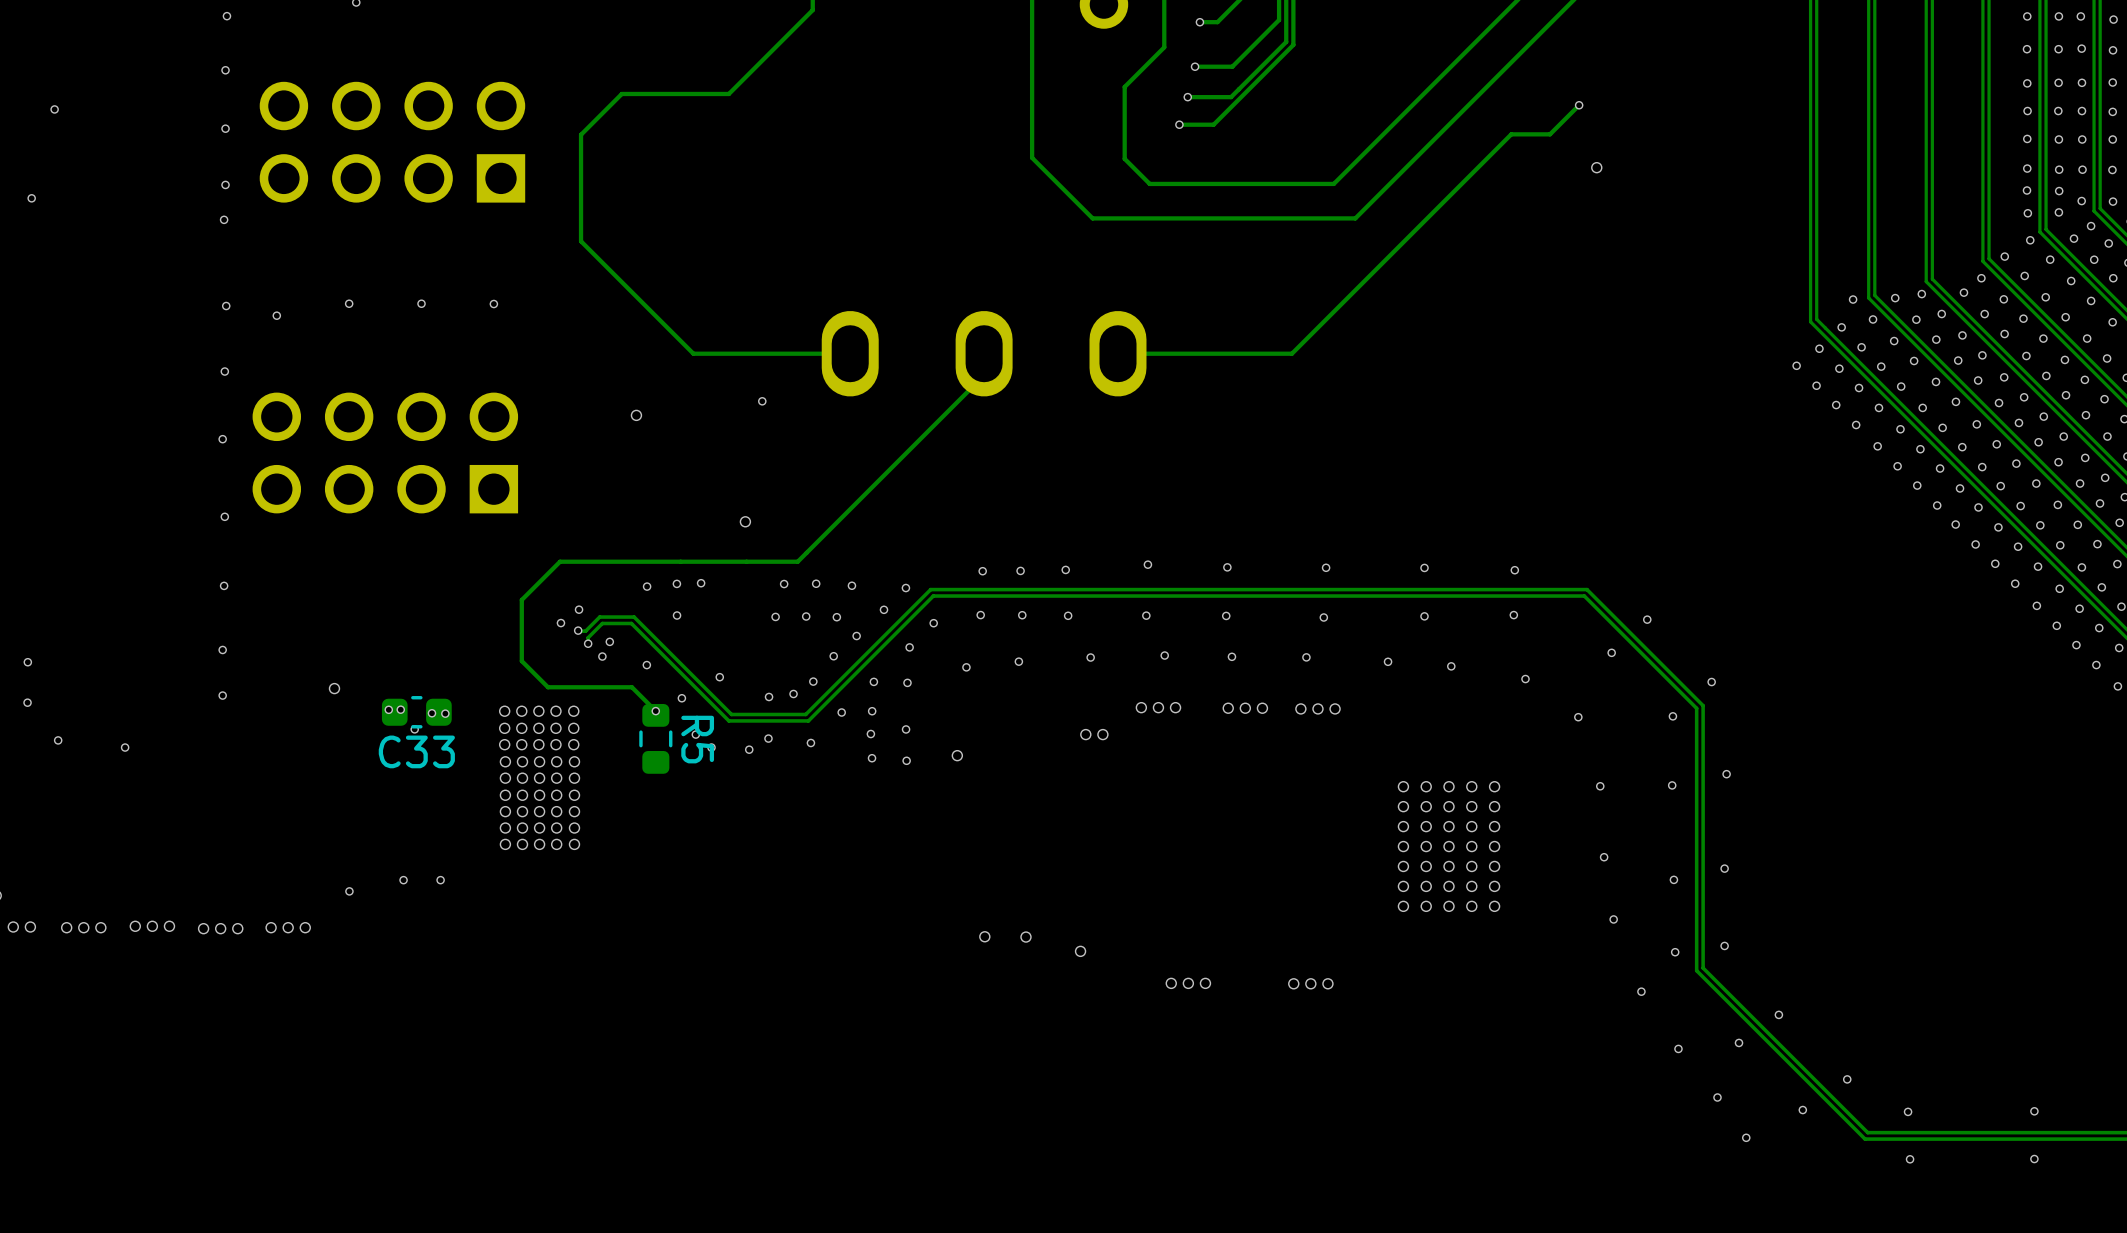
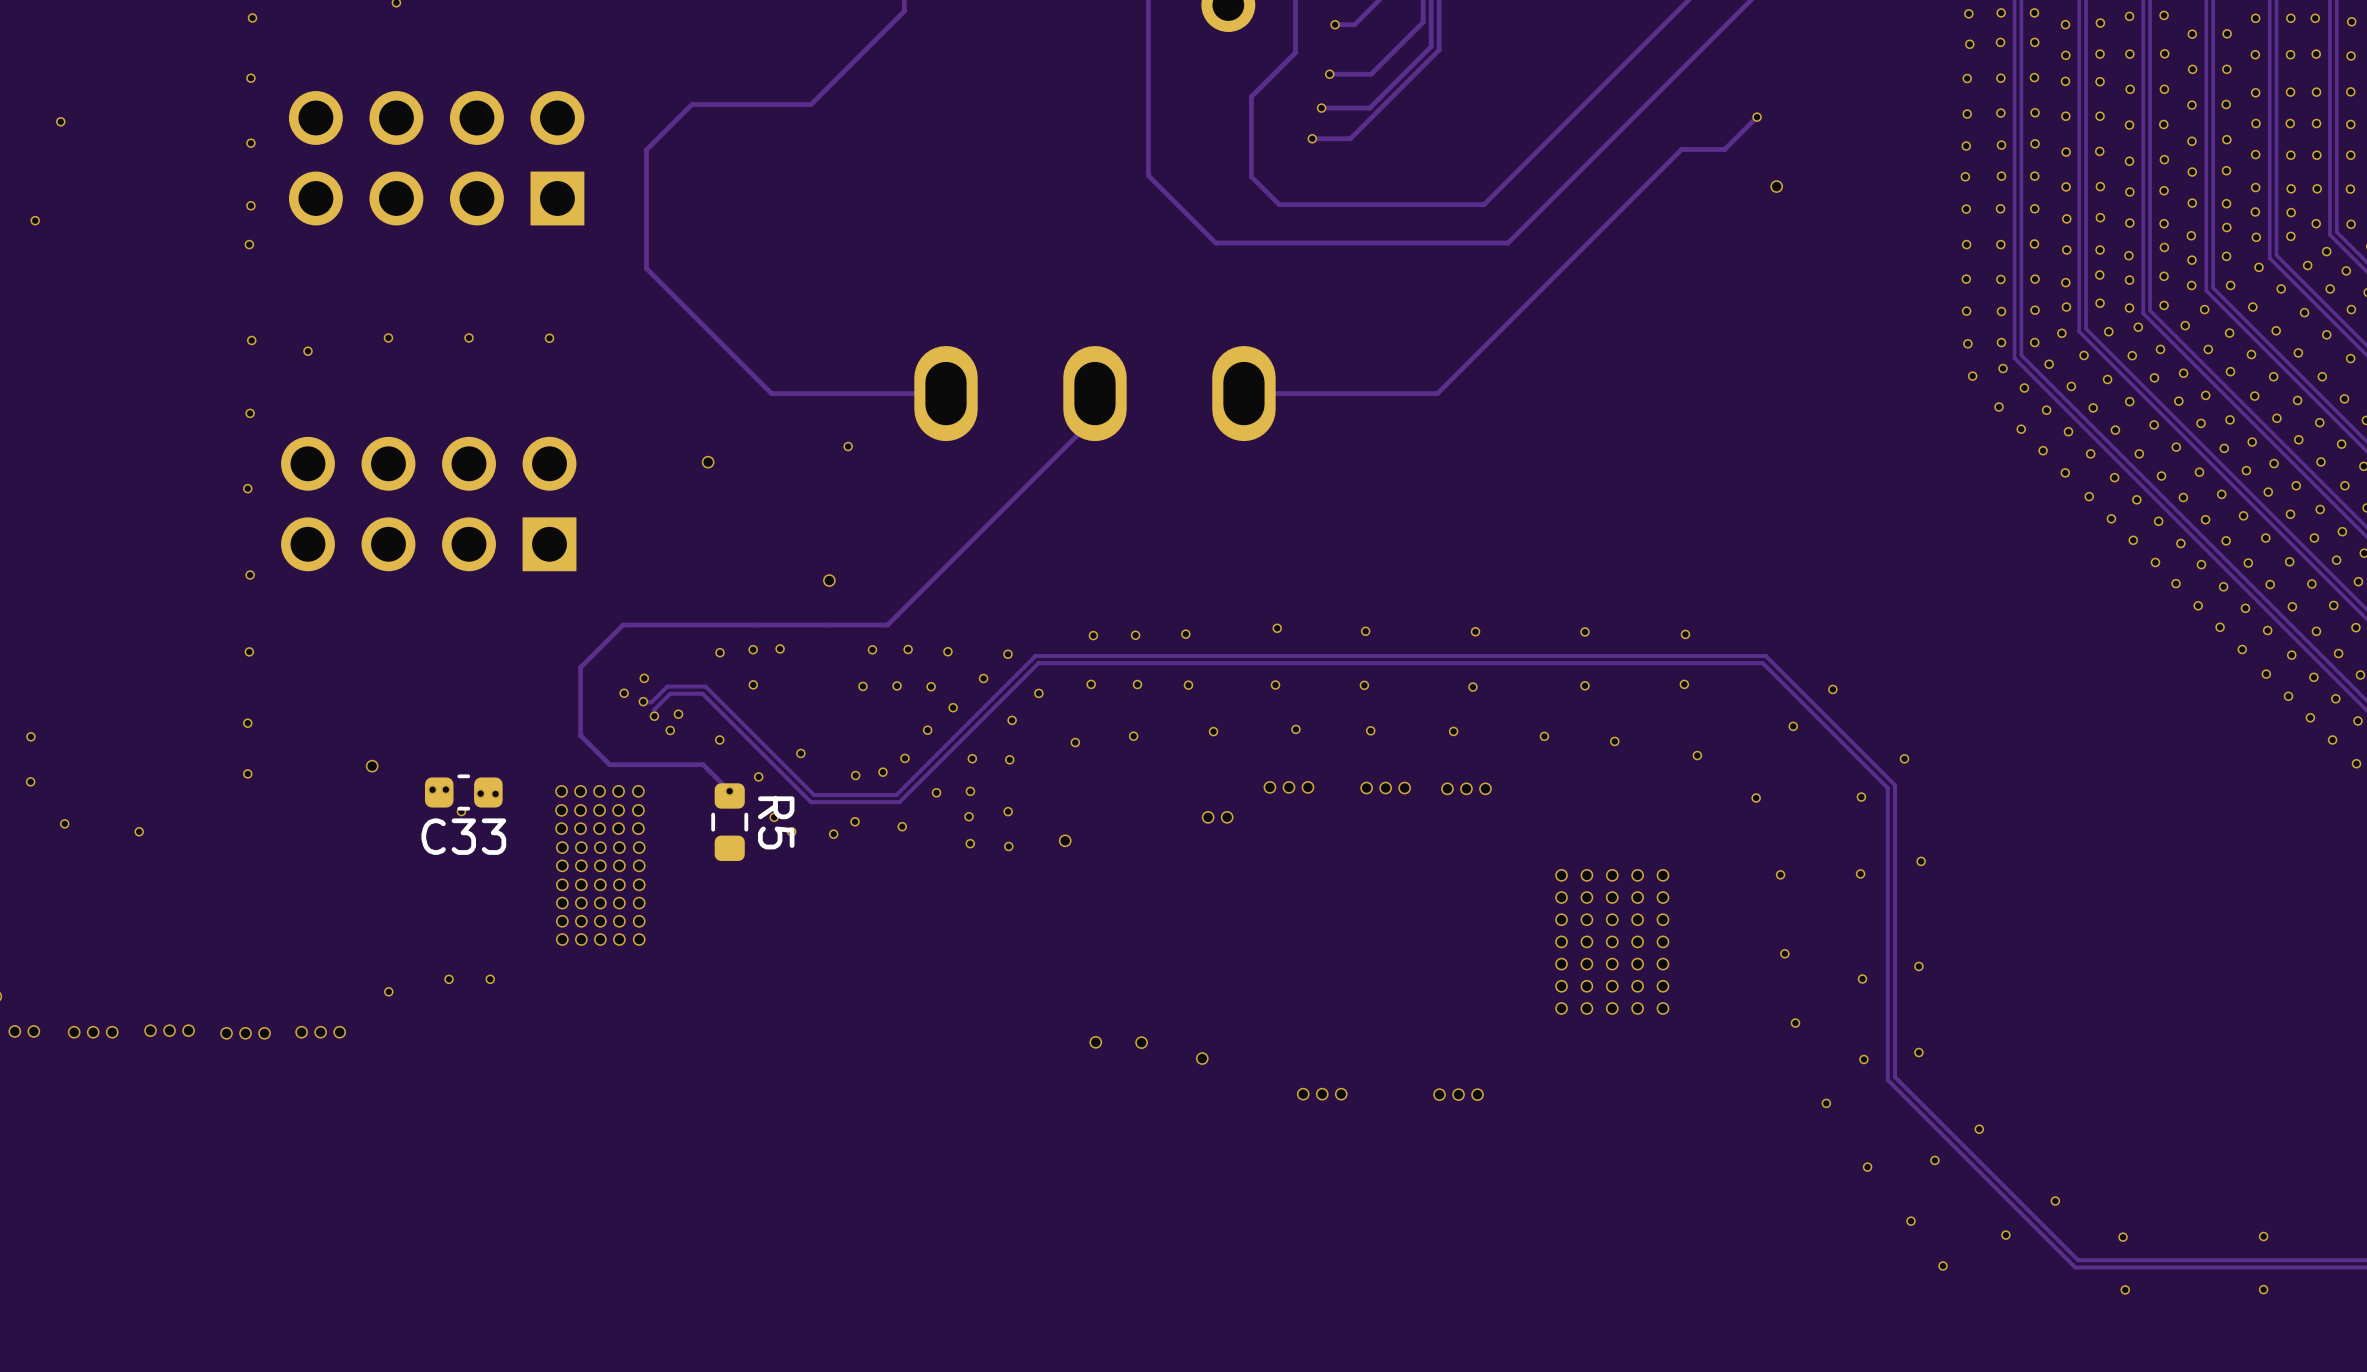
via: none -> (2001, 12)
via: none -> (2034, 12)
via: none -> (1968, 13)
via: none -> (2164, 15)
via: none -> (2129, 16)
via: none -> (2100, 23)
via: none -> (2065, 24)
via: none -> (2192, 34)
via: none -> (2227, 33)
via: none -> (2000, 42)
via: none -> (2034, 42)
via: none -> (1969, 44)
via: none -> (2100, 54)
via: none -> (2129, 54)
via: none -> (2164, 53)
via: none -> (2065, 55)
via: none -> (2192, 69)
via: none -> (2226, 69)
via: none -> (2034, 77)
via: none -> (1967, 78)
via: none -> (2000, 78)
via: none -> (2065, 81)
via: none -> (2100, 81)
via: none -> (2130, 89)
via: none -> (2164, 89)
via: none -> (2226, 104)
via: none -> (2191, 105)
via: none -> (2000, 113)
via: none -> (2035, 112)
via: none -> (1967, 114)
via: none -> (2065, 116)
via: none -> (2100, 116)
via: none -> (2163, 124)
via: none -> (2129, 125)
via: none -> (2226, 139)
via: none -> (2191, 141)
via: none -> (2035, 143)
via: none -> (2001, 145)
via: none -> (1966, 146)
via: none -> (2066, 152)
via: none -> (2099, 151)
via: none -> (2164, 159)
via: none -> (2129, 161)
via: none -> (2226, 170)
via: none -> (2192, 172)
via: none -> (1965, 176)
via: none -> (2001, 176)
via: none -> (2034, 176)
via: none -> (2066, 186)
via: none -> (2100, 186)
via: none -> (2164, 190)
via: none -> (2129, 191)
via: none -> (2192, 203)
via: none -> (2226, 203)
via: none -> (1966, 209)
via: none -> (2000, 208)
via: none -> (2034, 208)
via: none -> (2100, 217)
via: none -> (2066, 218)
via: none -> (2129, 223)
via: none -> (2164, 223)
via: none -> (2226, 227)
via: none -> (2191, 235)
via: none -> (1966, 244)
via: none -> (2000, 244)
via: none -> (2034, 243)
via: none -> (2164, 247)
via: none -> (2066, 249)
via: none -> (2100, 249)
via: none -> (2128, 255)
via: none -> (2226, 256)
via: none -> (2191, 260)
via: none -> (2099, 275)
via: none -> (2164, 276)
via: none -> (1966, 279)
via: none -> (2035, 279)
via: none -> (2000, 279)
via: none -> (2129, 280)
via: none -> (2065, 282)
via: none -> (2191, 285)
via: none -> (2100, 303)
via: none -> (2164, 305)
via: none -> (2066, 307)
via: none -> (2129, 307)
via: none -> (2035, 310)
via: none -> (1966, 311)
via: none -> (2001, 311)
via: none -> (2001, 342)
via: none -> (2034, 342)
via: none -> (1967, 343)
via: none -> (2003, 368)
via: none -> (1972, 376)

